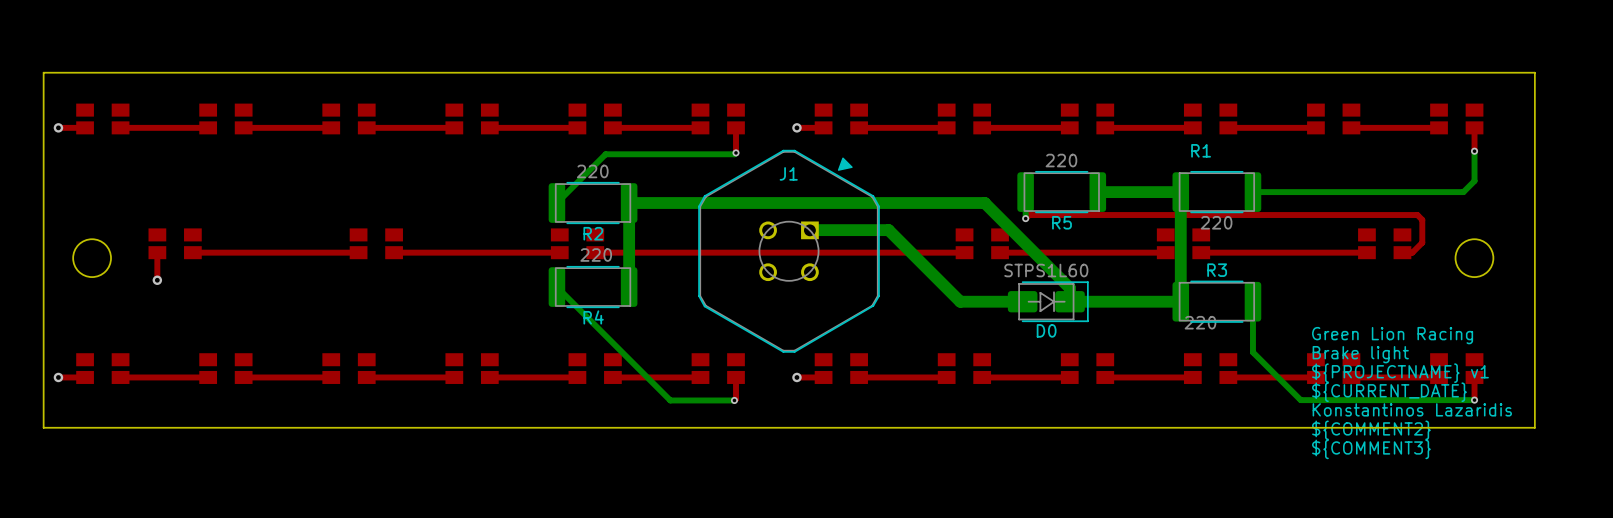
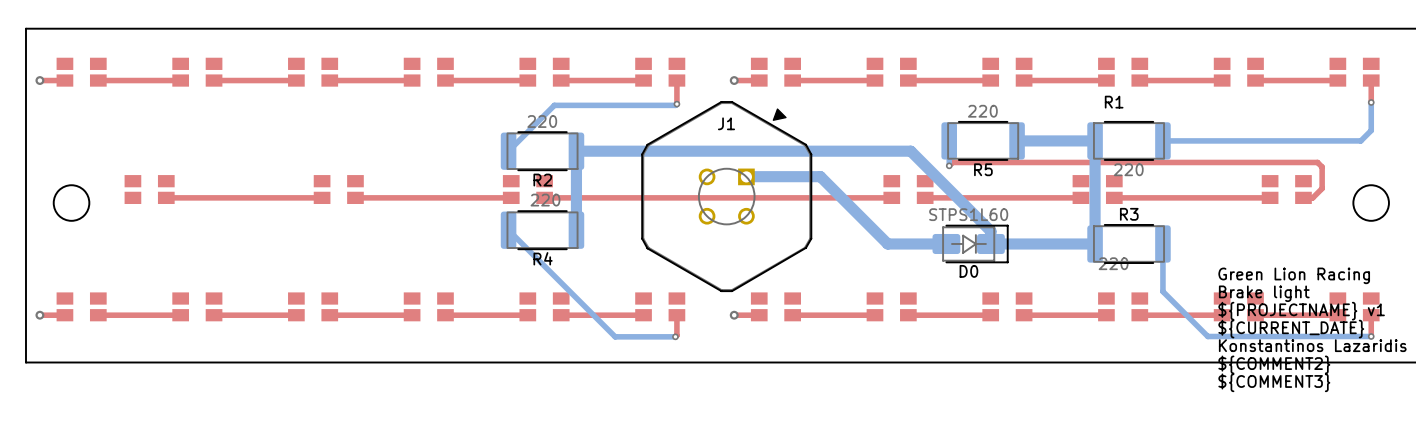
top track: (157, 253) (157, 280) -> none
via: (157, 280) -> none

